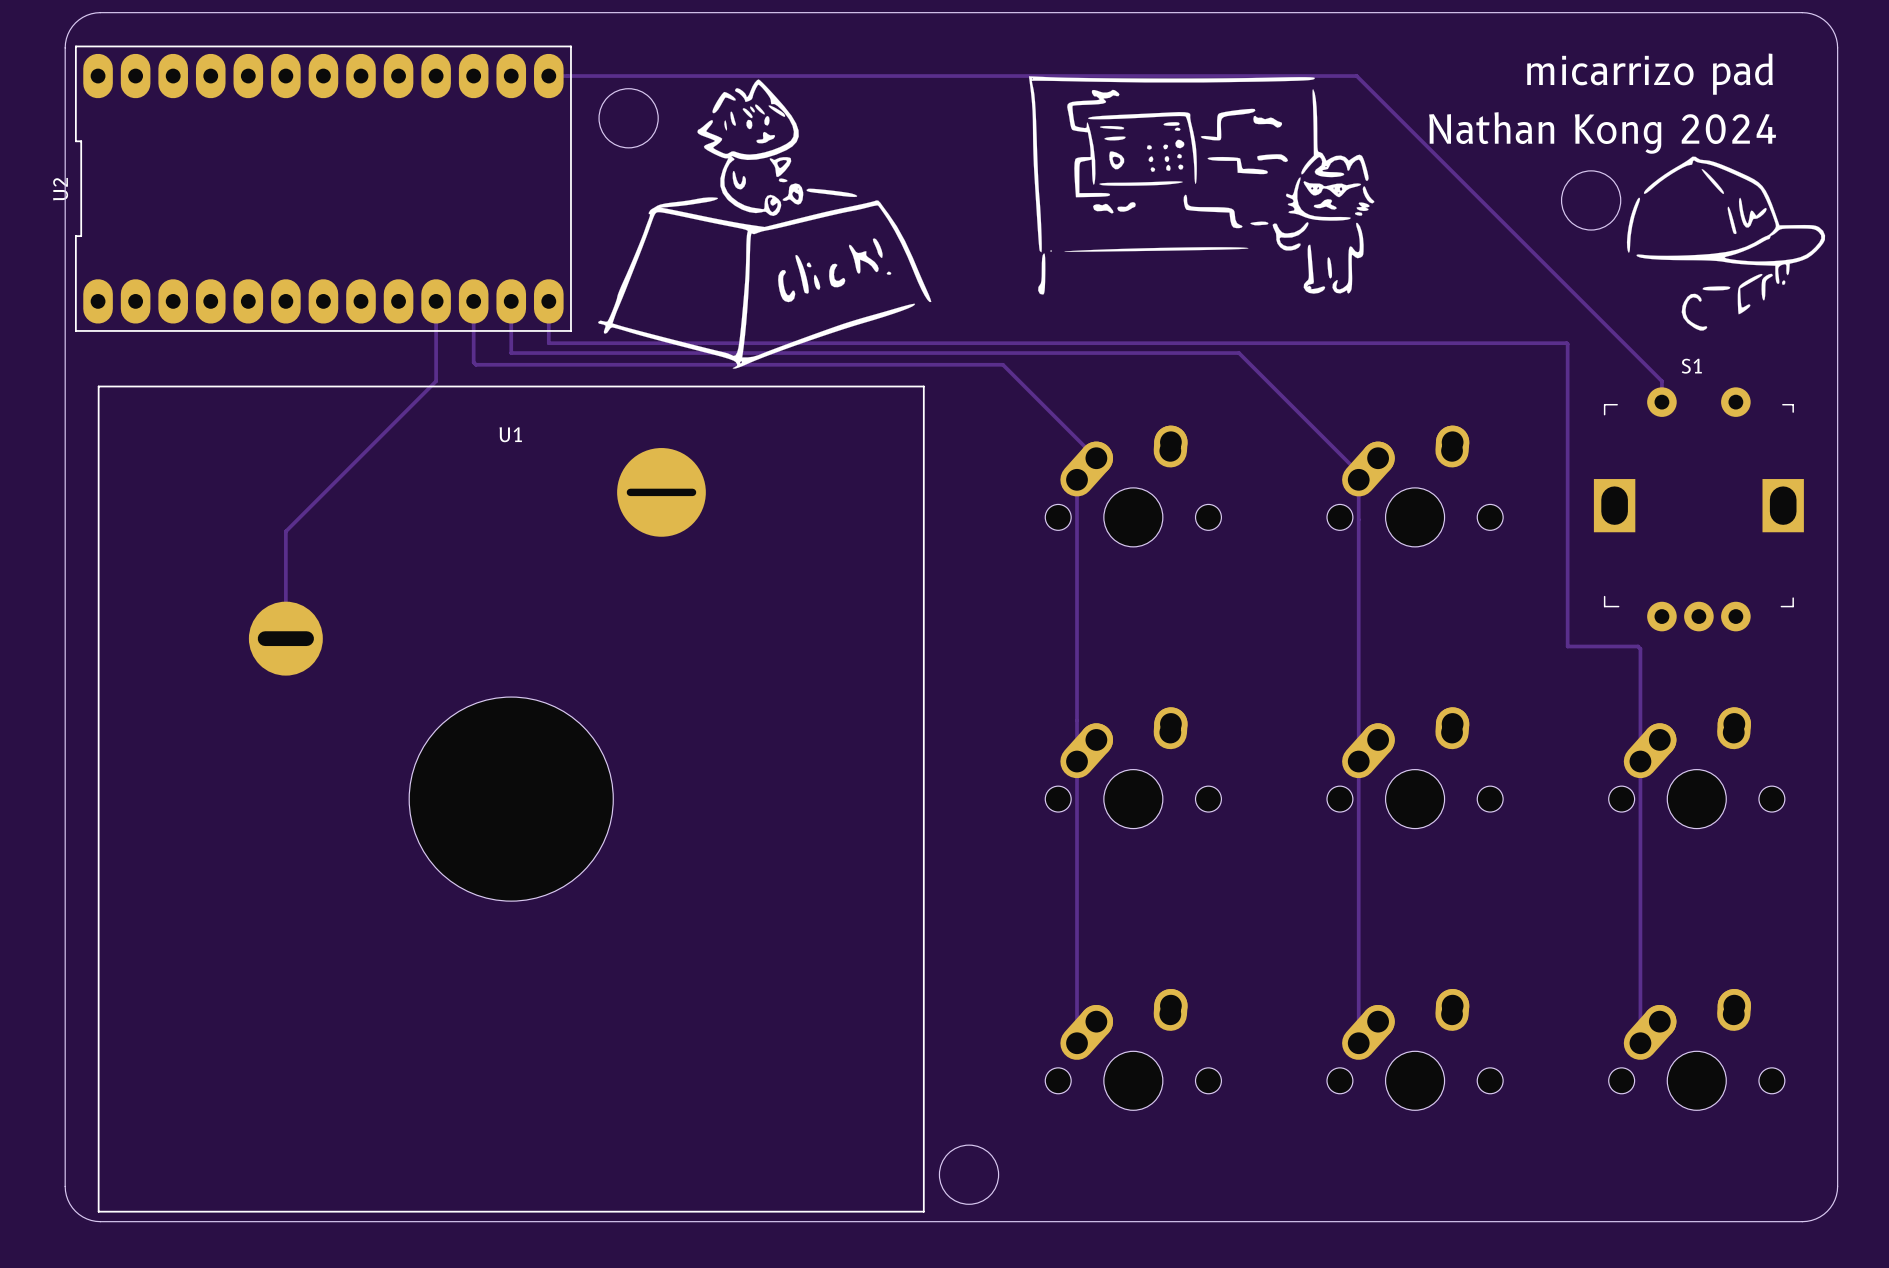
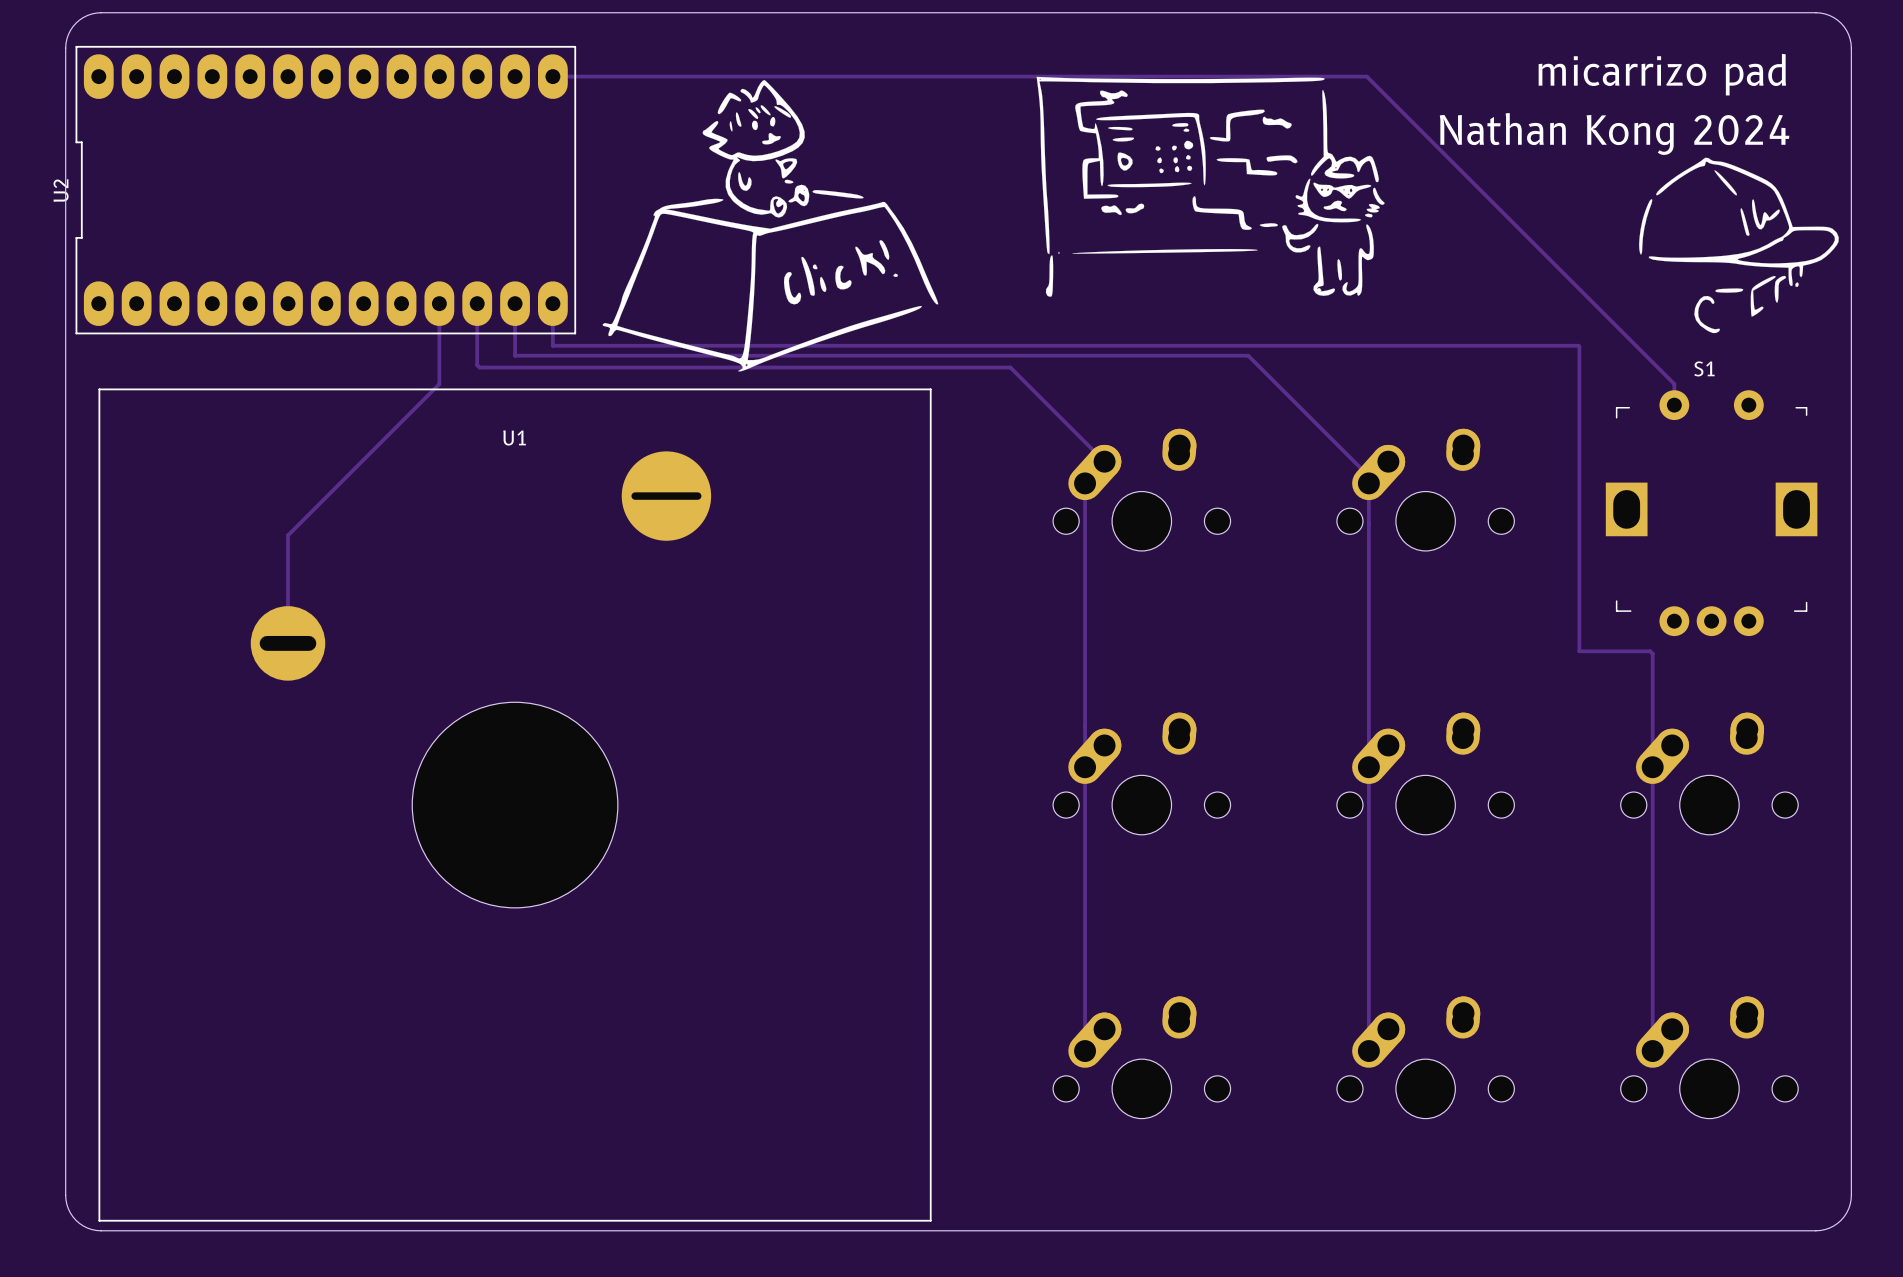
round board edge: [598, 88, 659, 149] -> none
round board edge: [1561, 170, 1622, 231] -> none
round board edge: [939, 1144, 999, 1205] -> none

